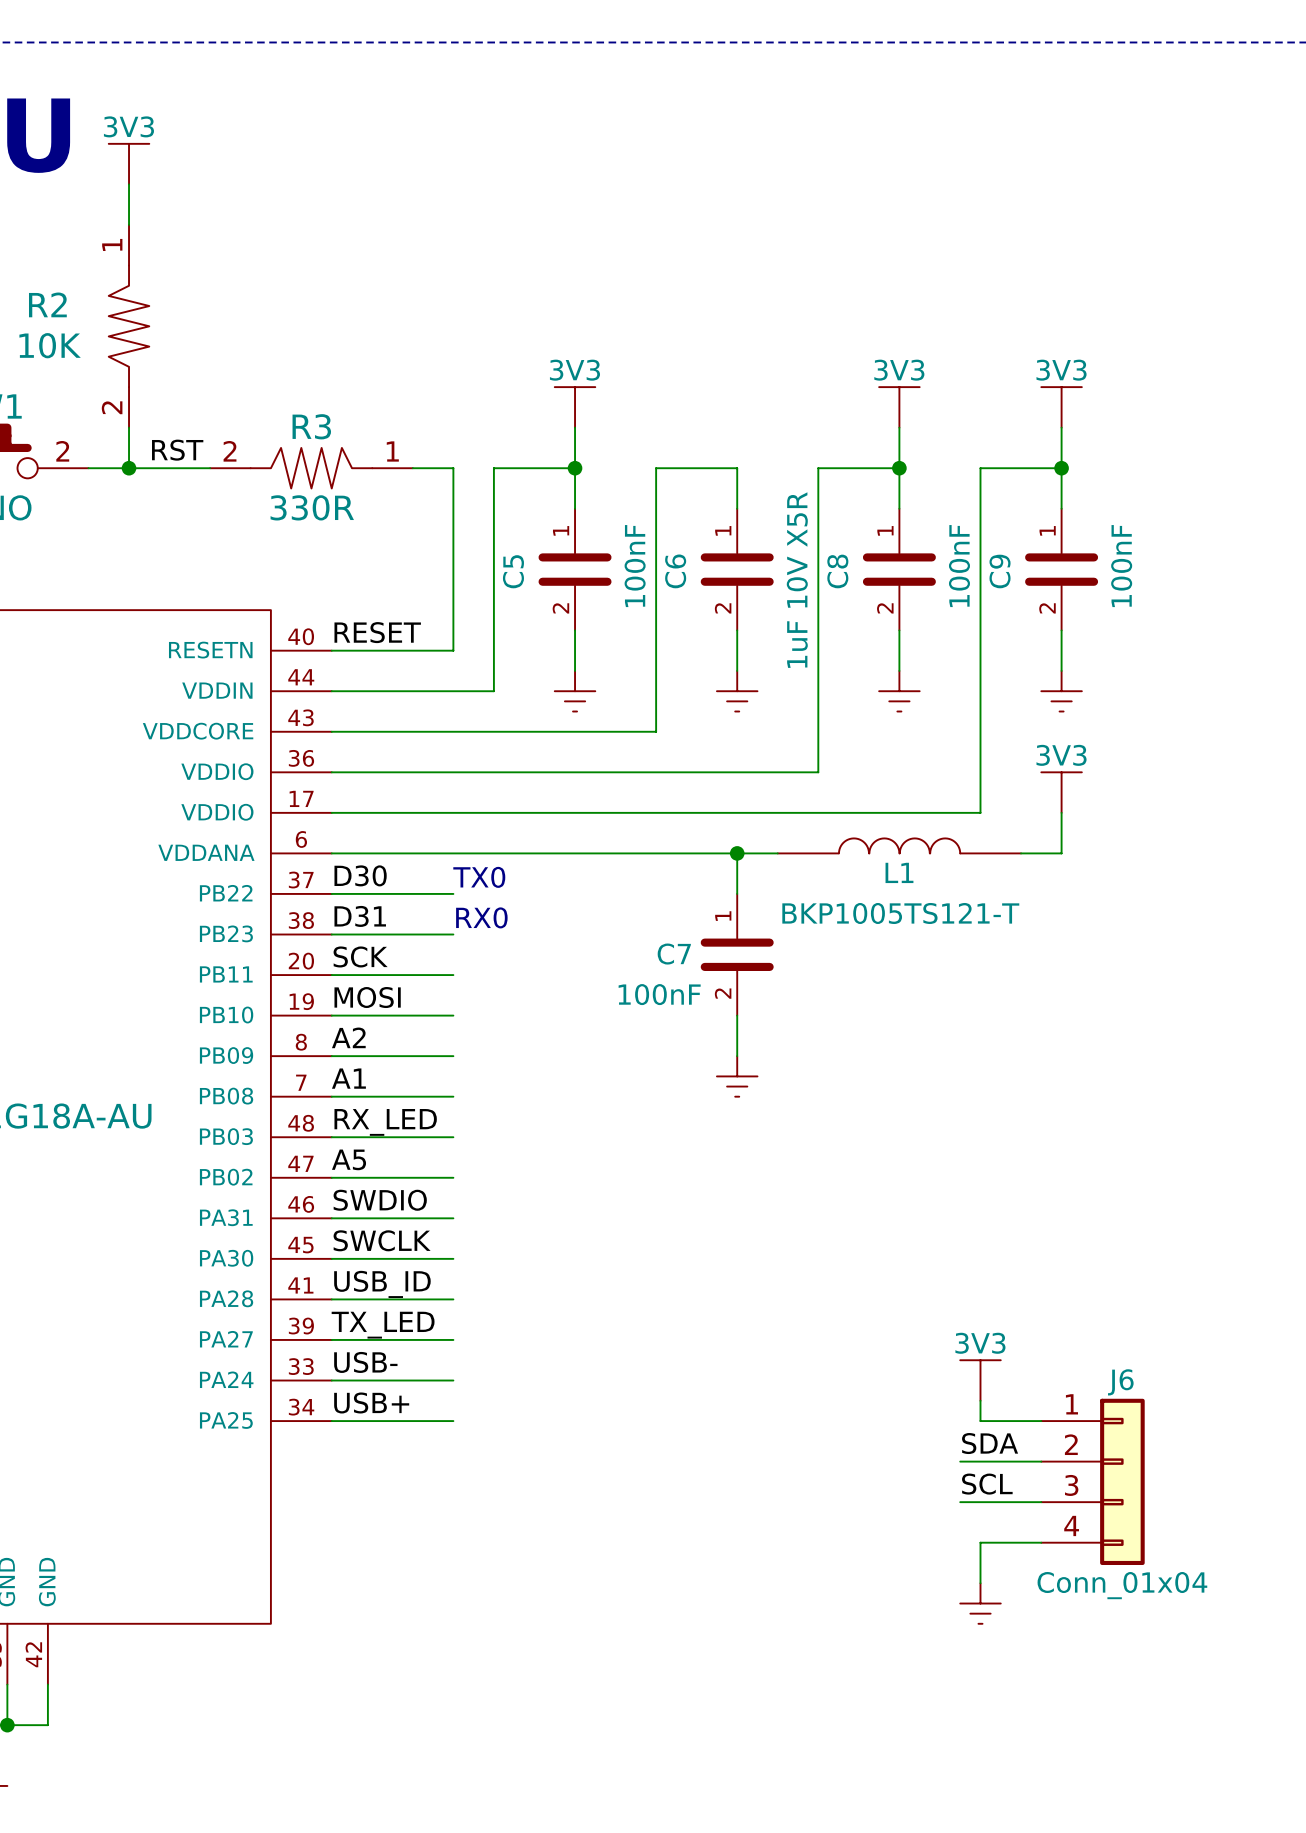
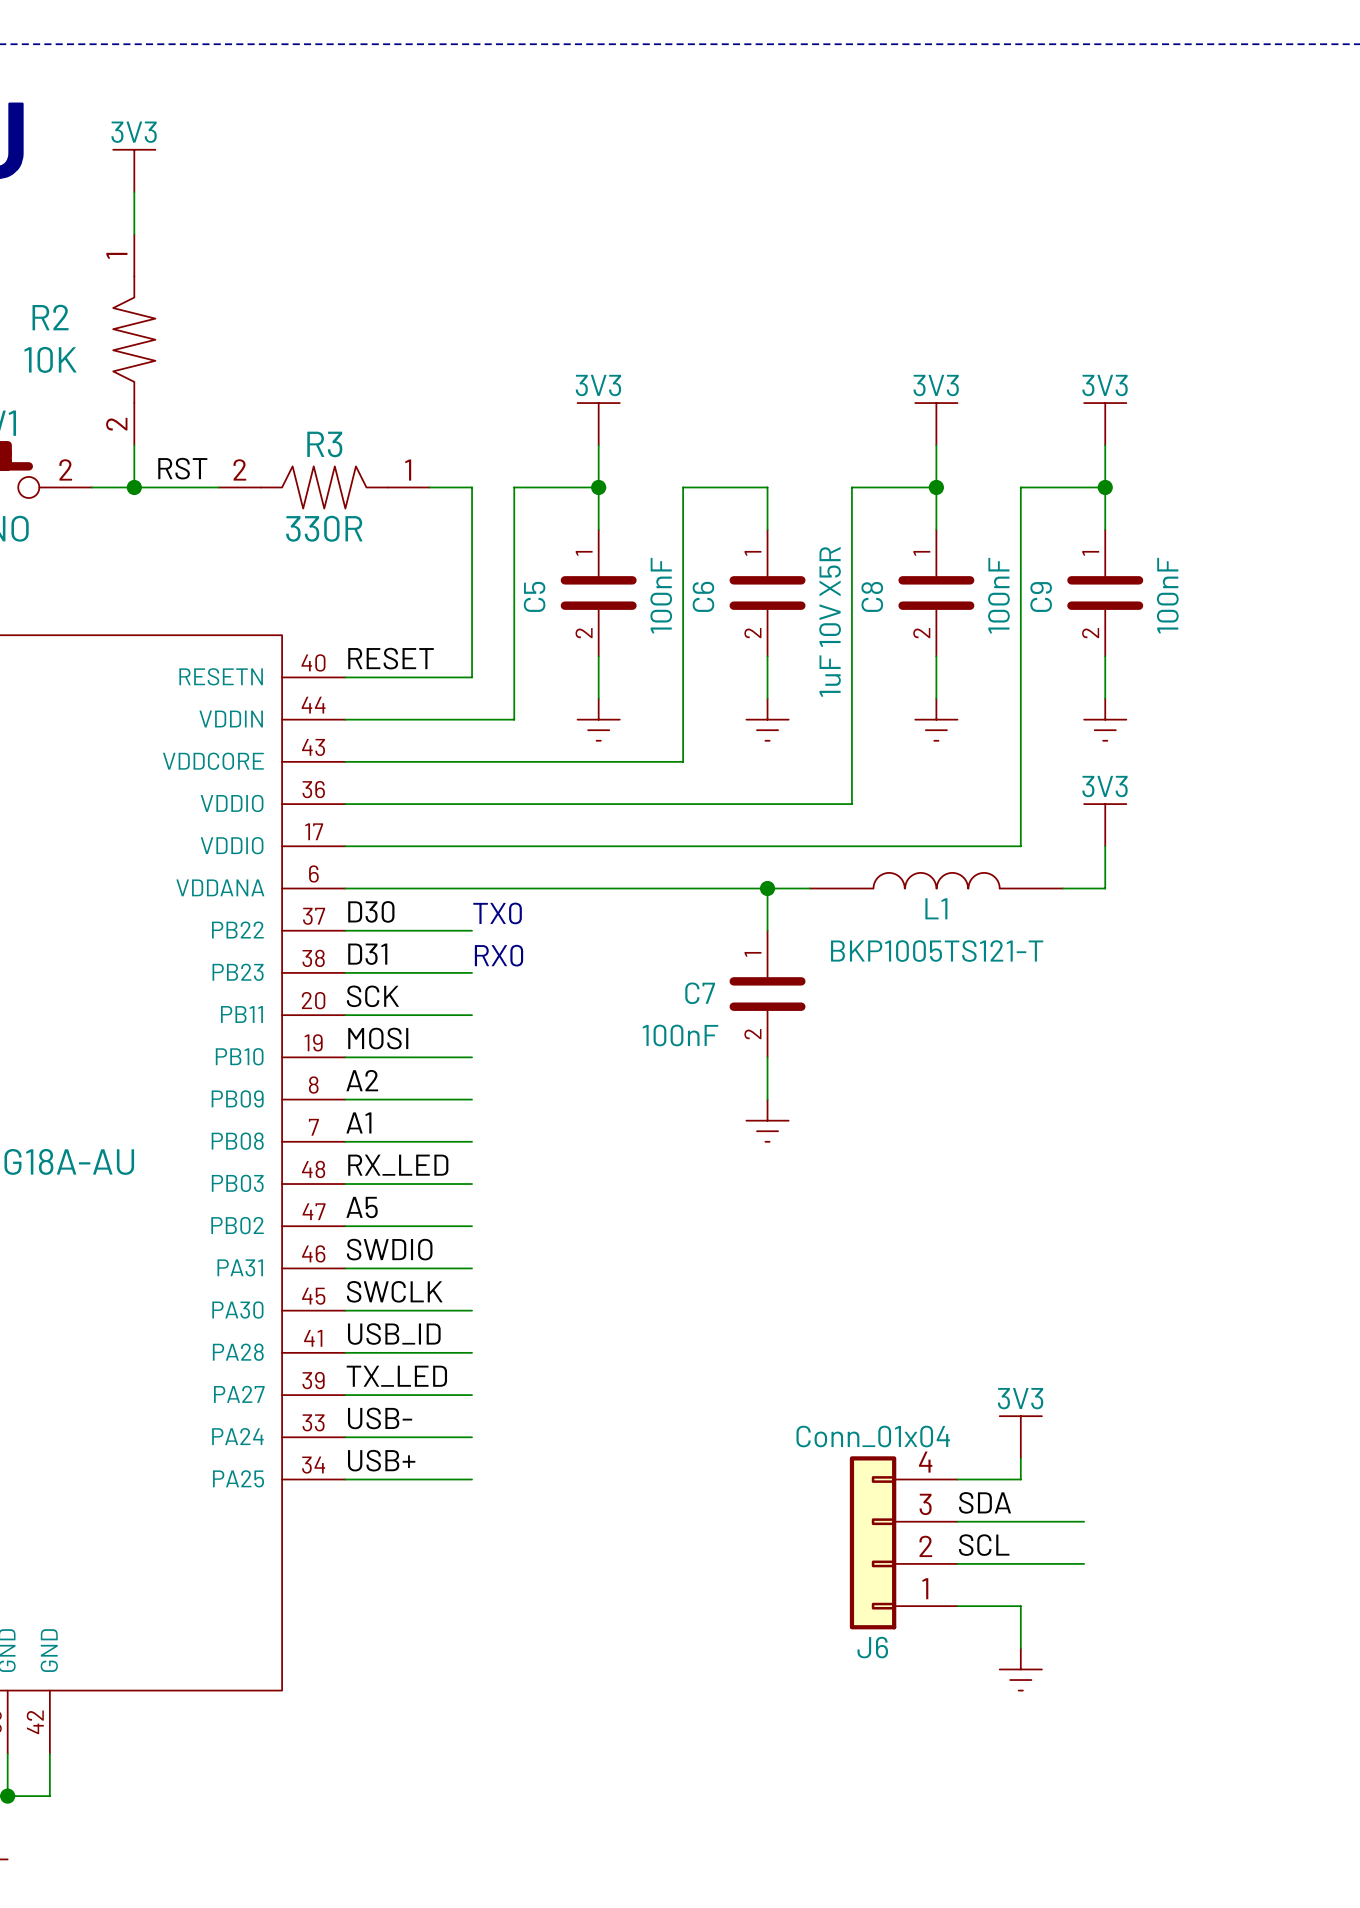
wire: (980, 1421) (1041, 1421) -> (1020, 1479) (957, 1479)
label position: SDA (990, 1443) -> SDA (985, 1502)
wire: none -> (957, 1521) (999, 1521)
J6 position: (1093, 1481) -> (903, 1542)
J6 rotation: 0° (1122, 1481) -> 180° (873, 1542)
label position: SCL (987, 1484) -> SCL (984, 1545)
wire: none -> (957, 1563) (999, 1563)
wire: (980, 1542) (1041, 1542) -> (1020, 1606) (957, 1606)

